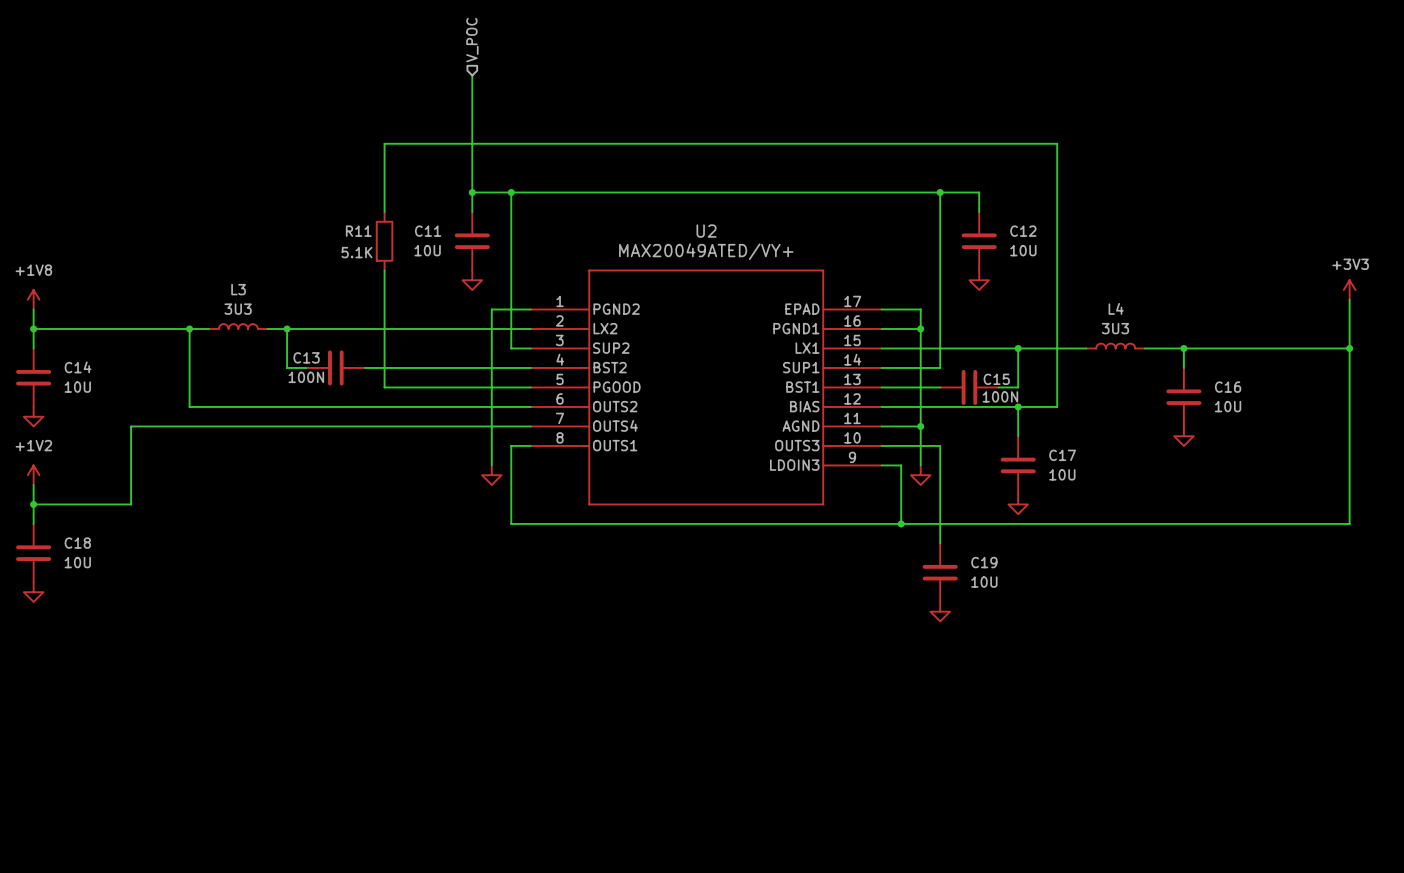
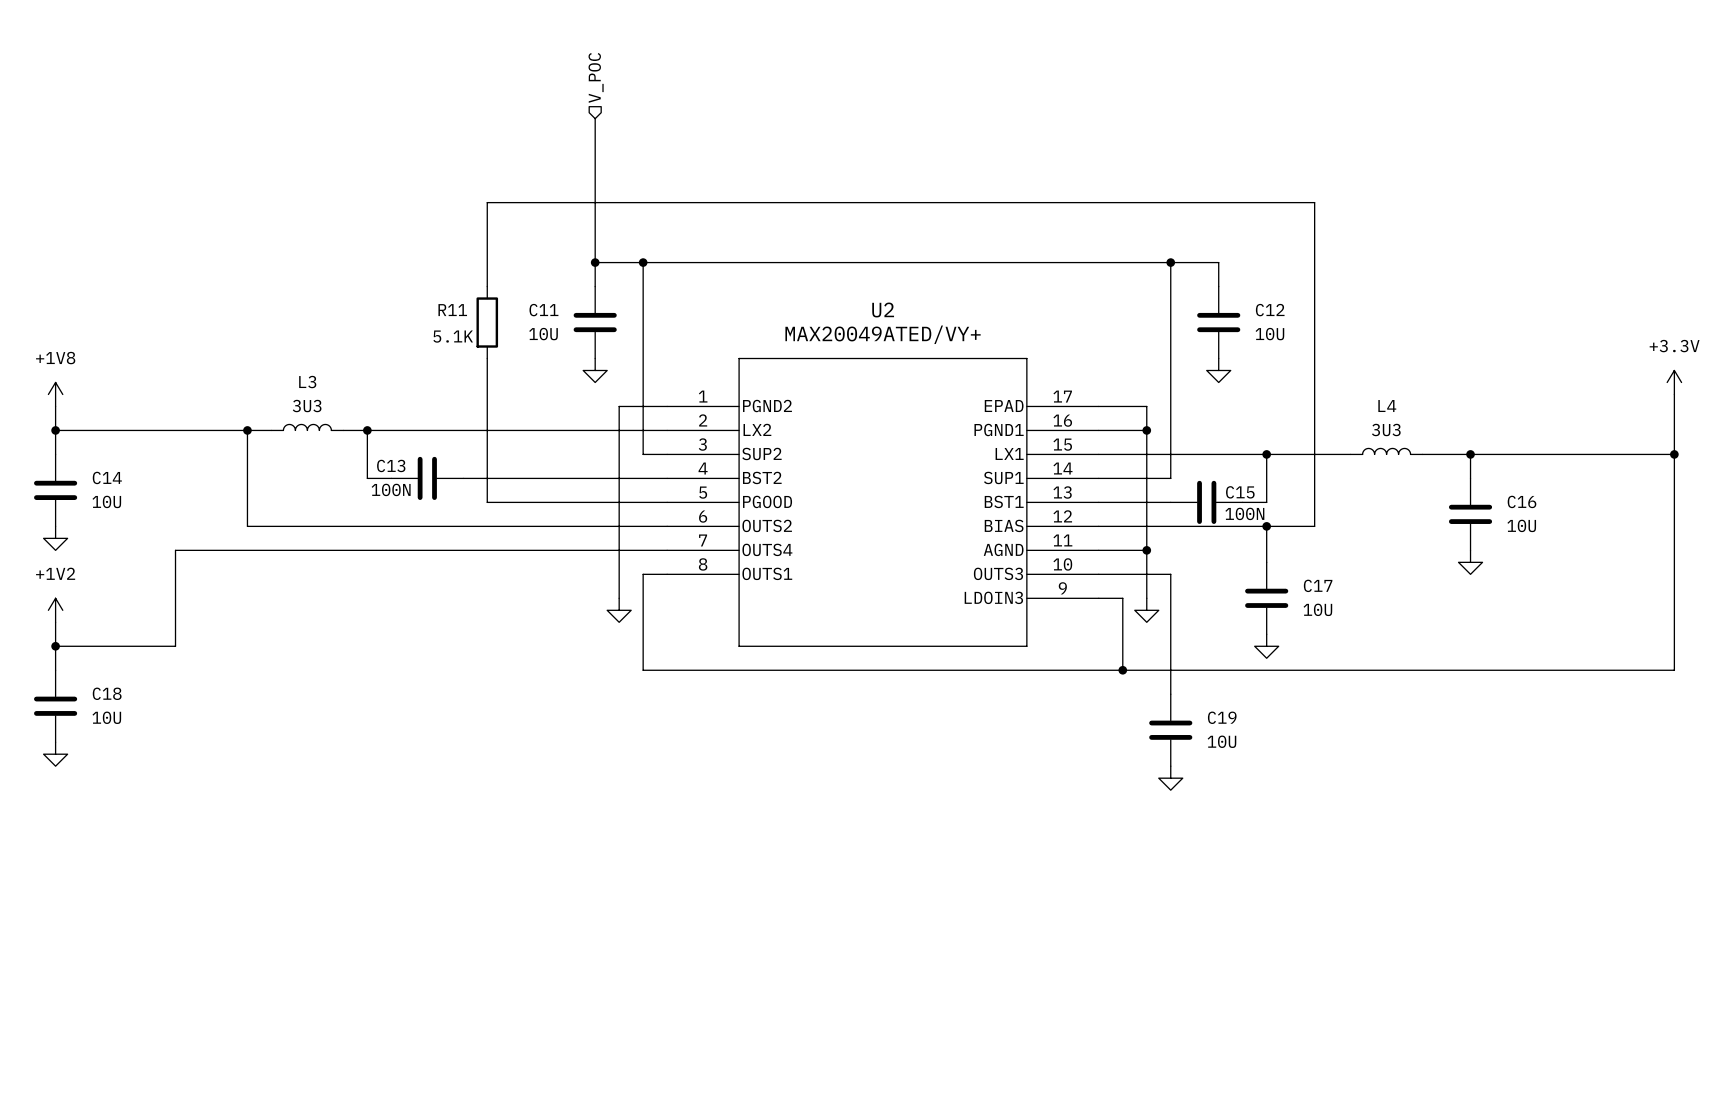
power symbol: +3V3 (1349, 289) -> +3.3V (1674, 382)

